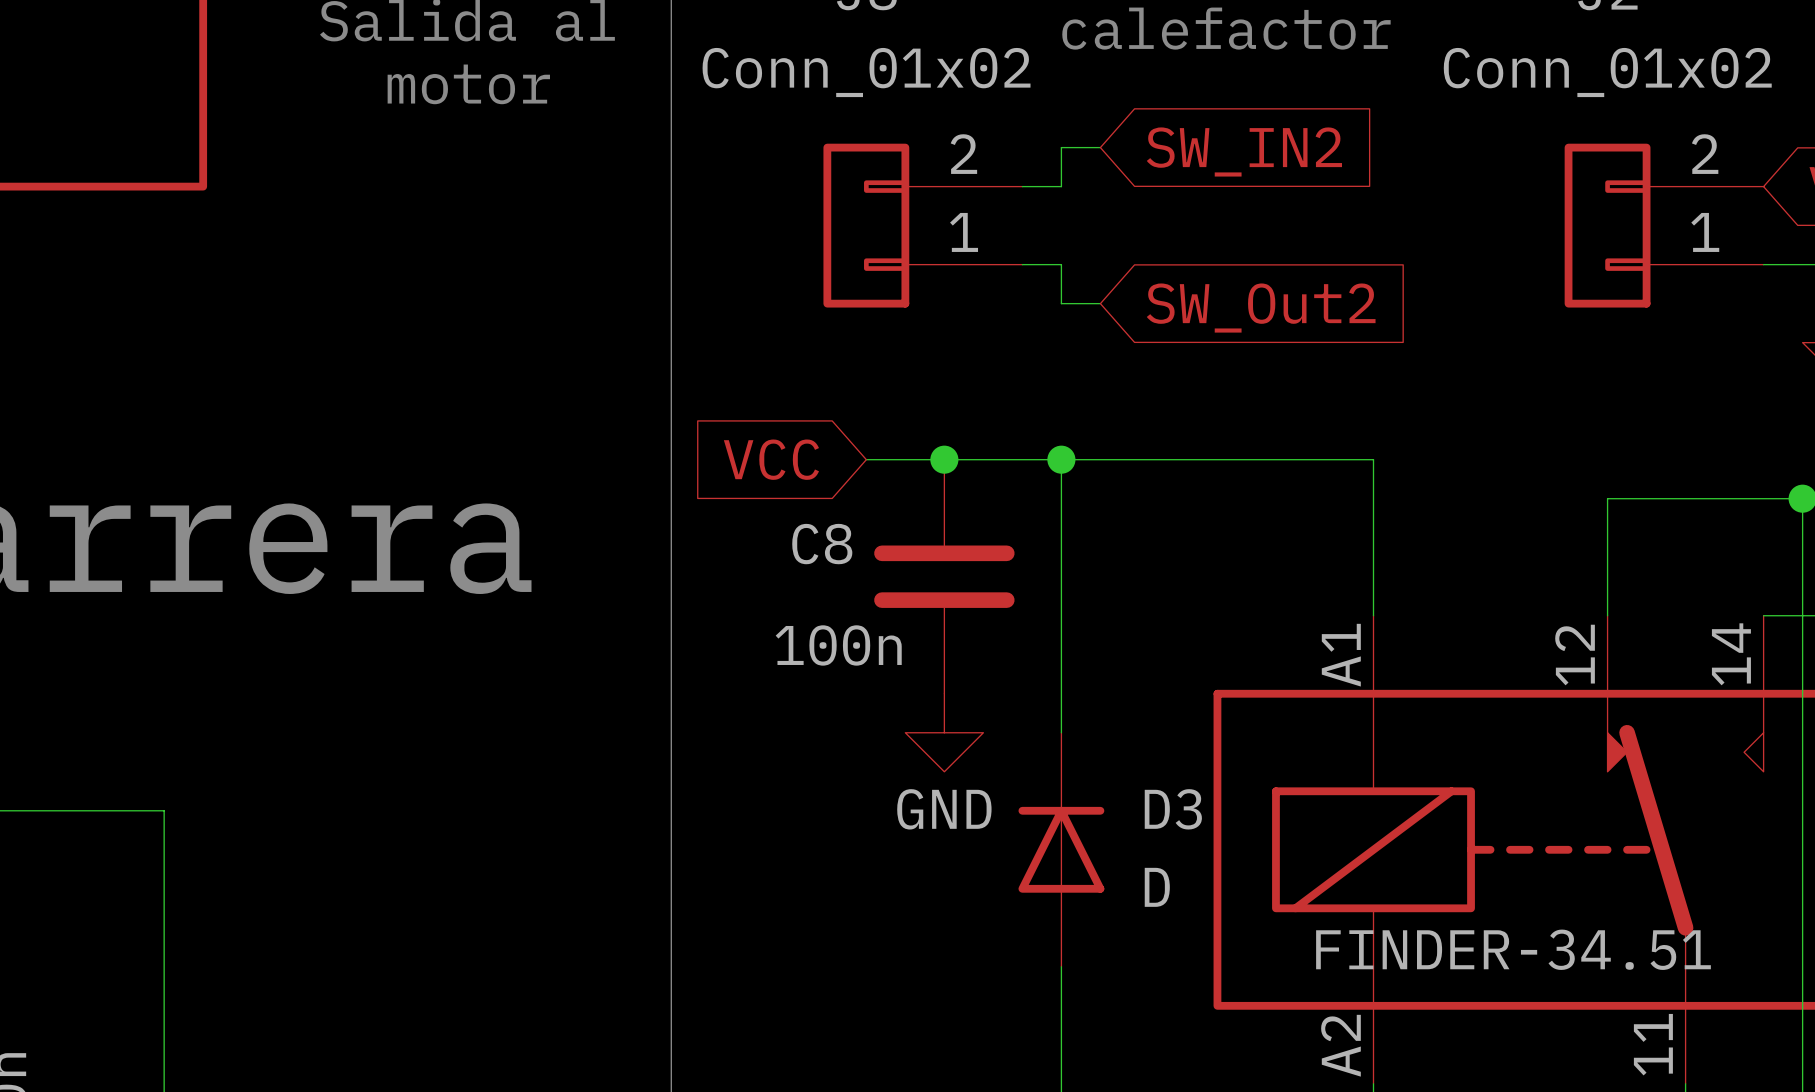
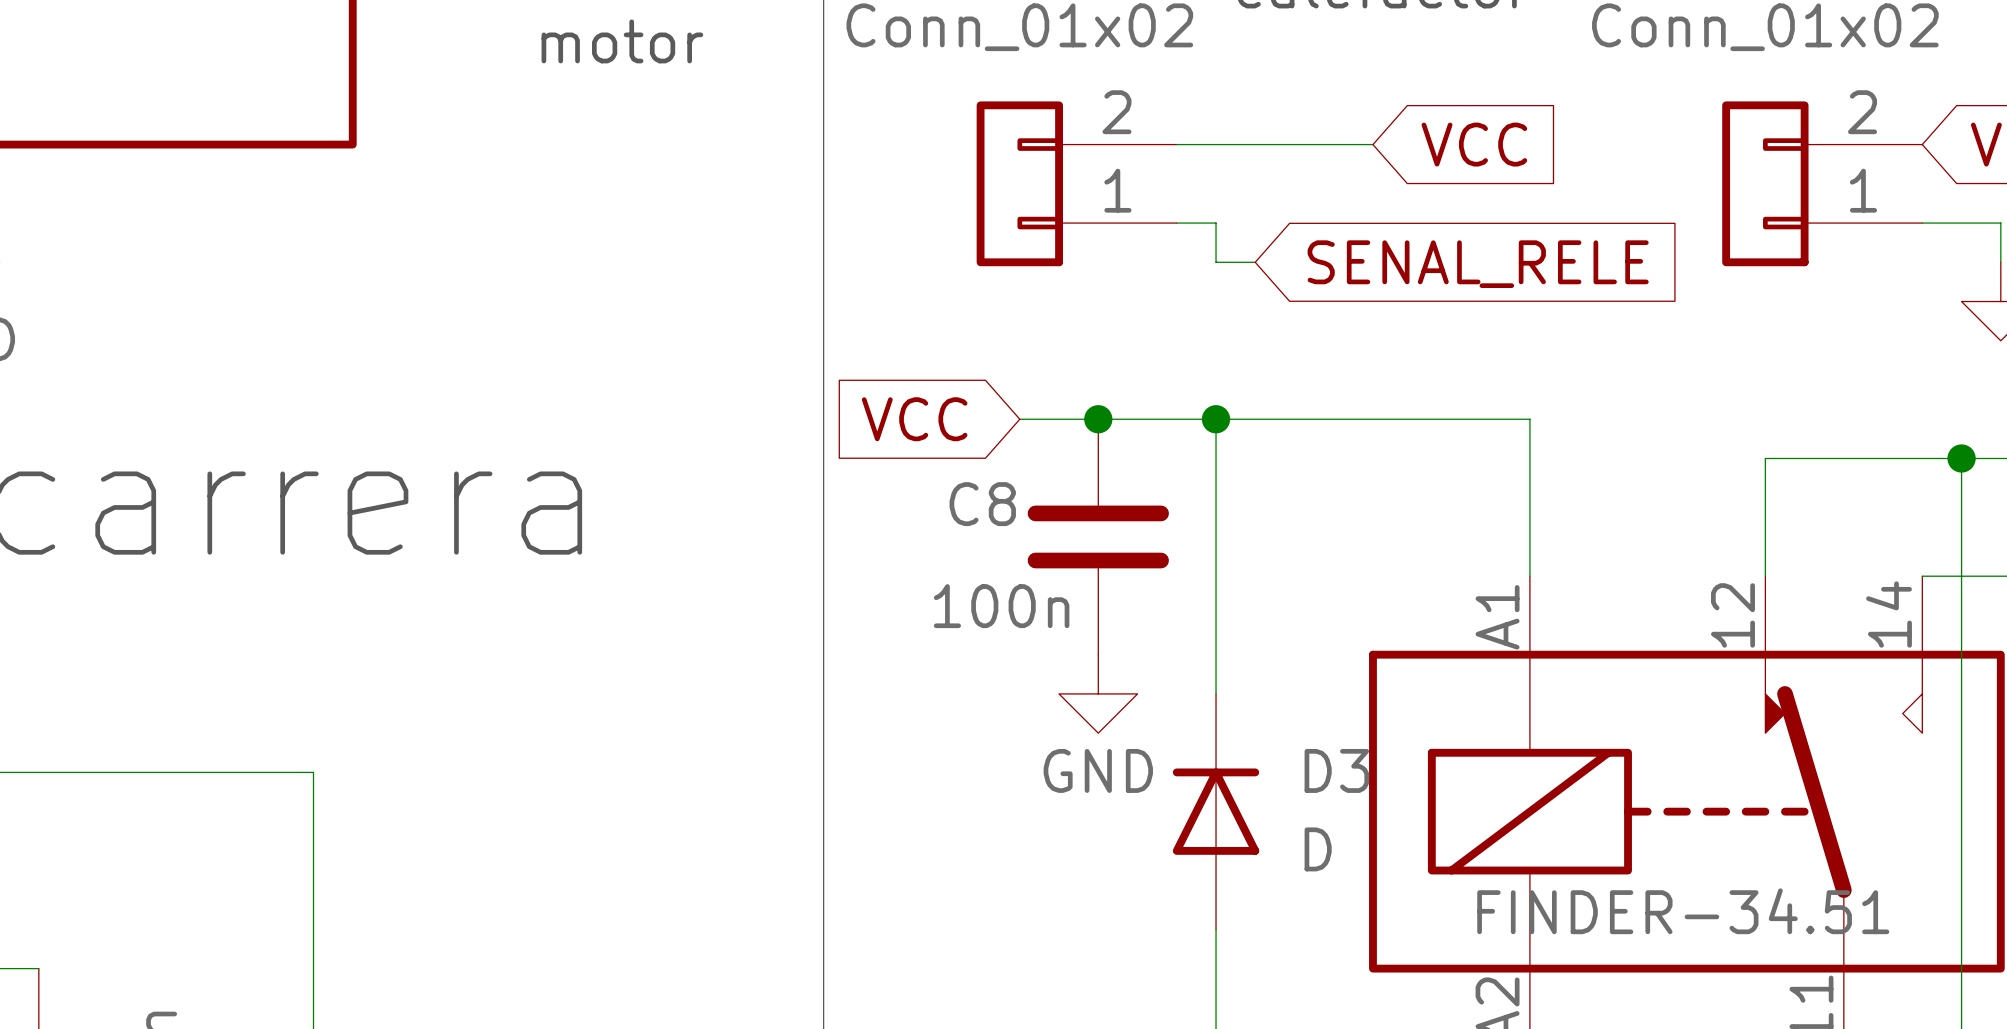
wire: (1100, 147) (1061, 147) (1061, 186) -> (1372, 144) (1216, 144)
global label: SW_IN2 (1244, 151) -> none
global label: none -> VCC (1474, 144)
global label: SW_Out2 (1261, 308) -> SENAL_RELE (1478, 264)

